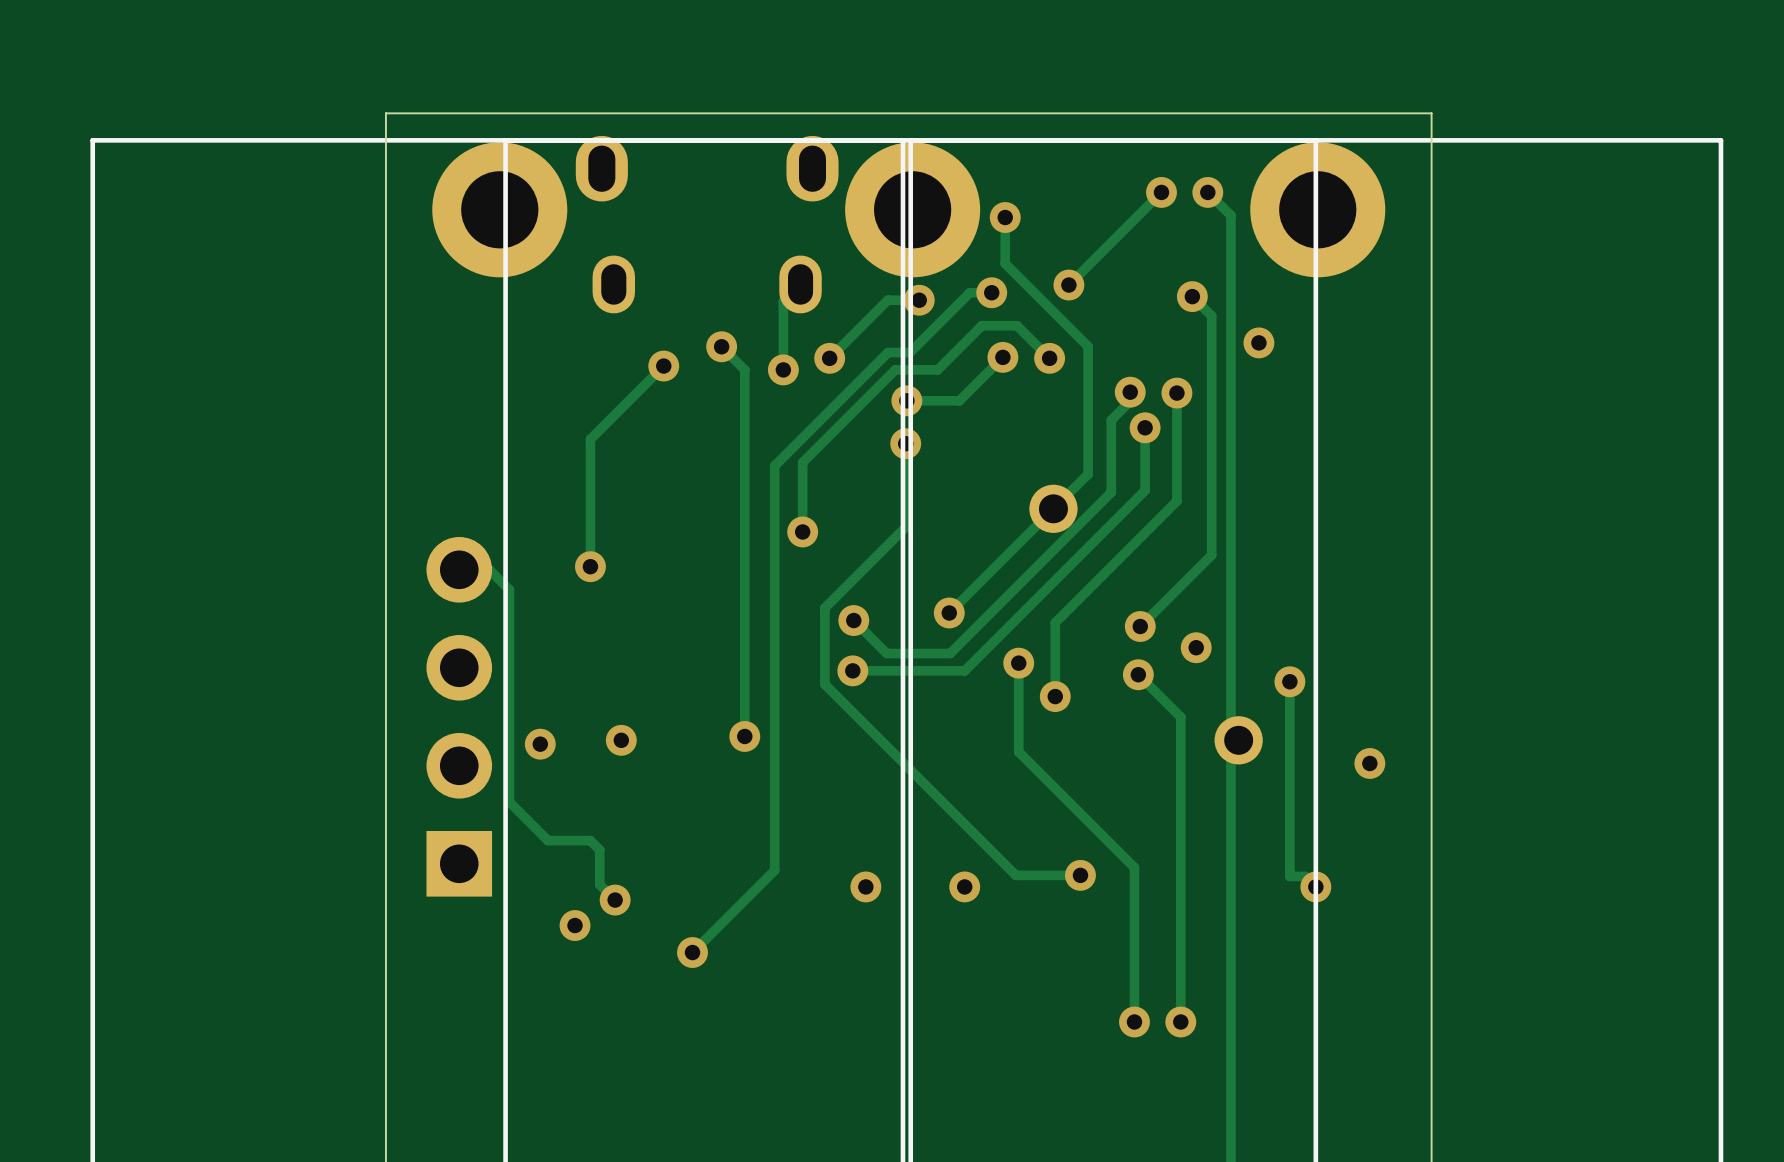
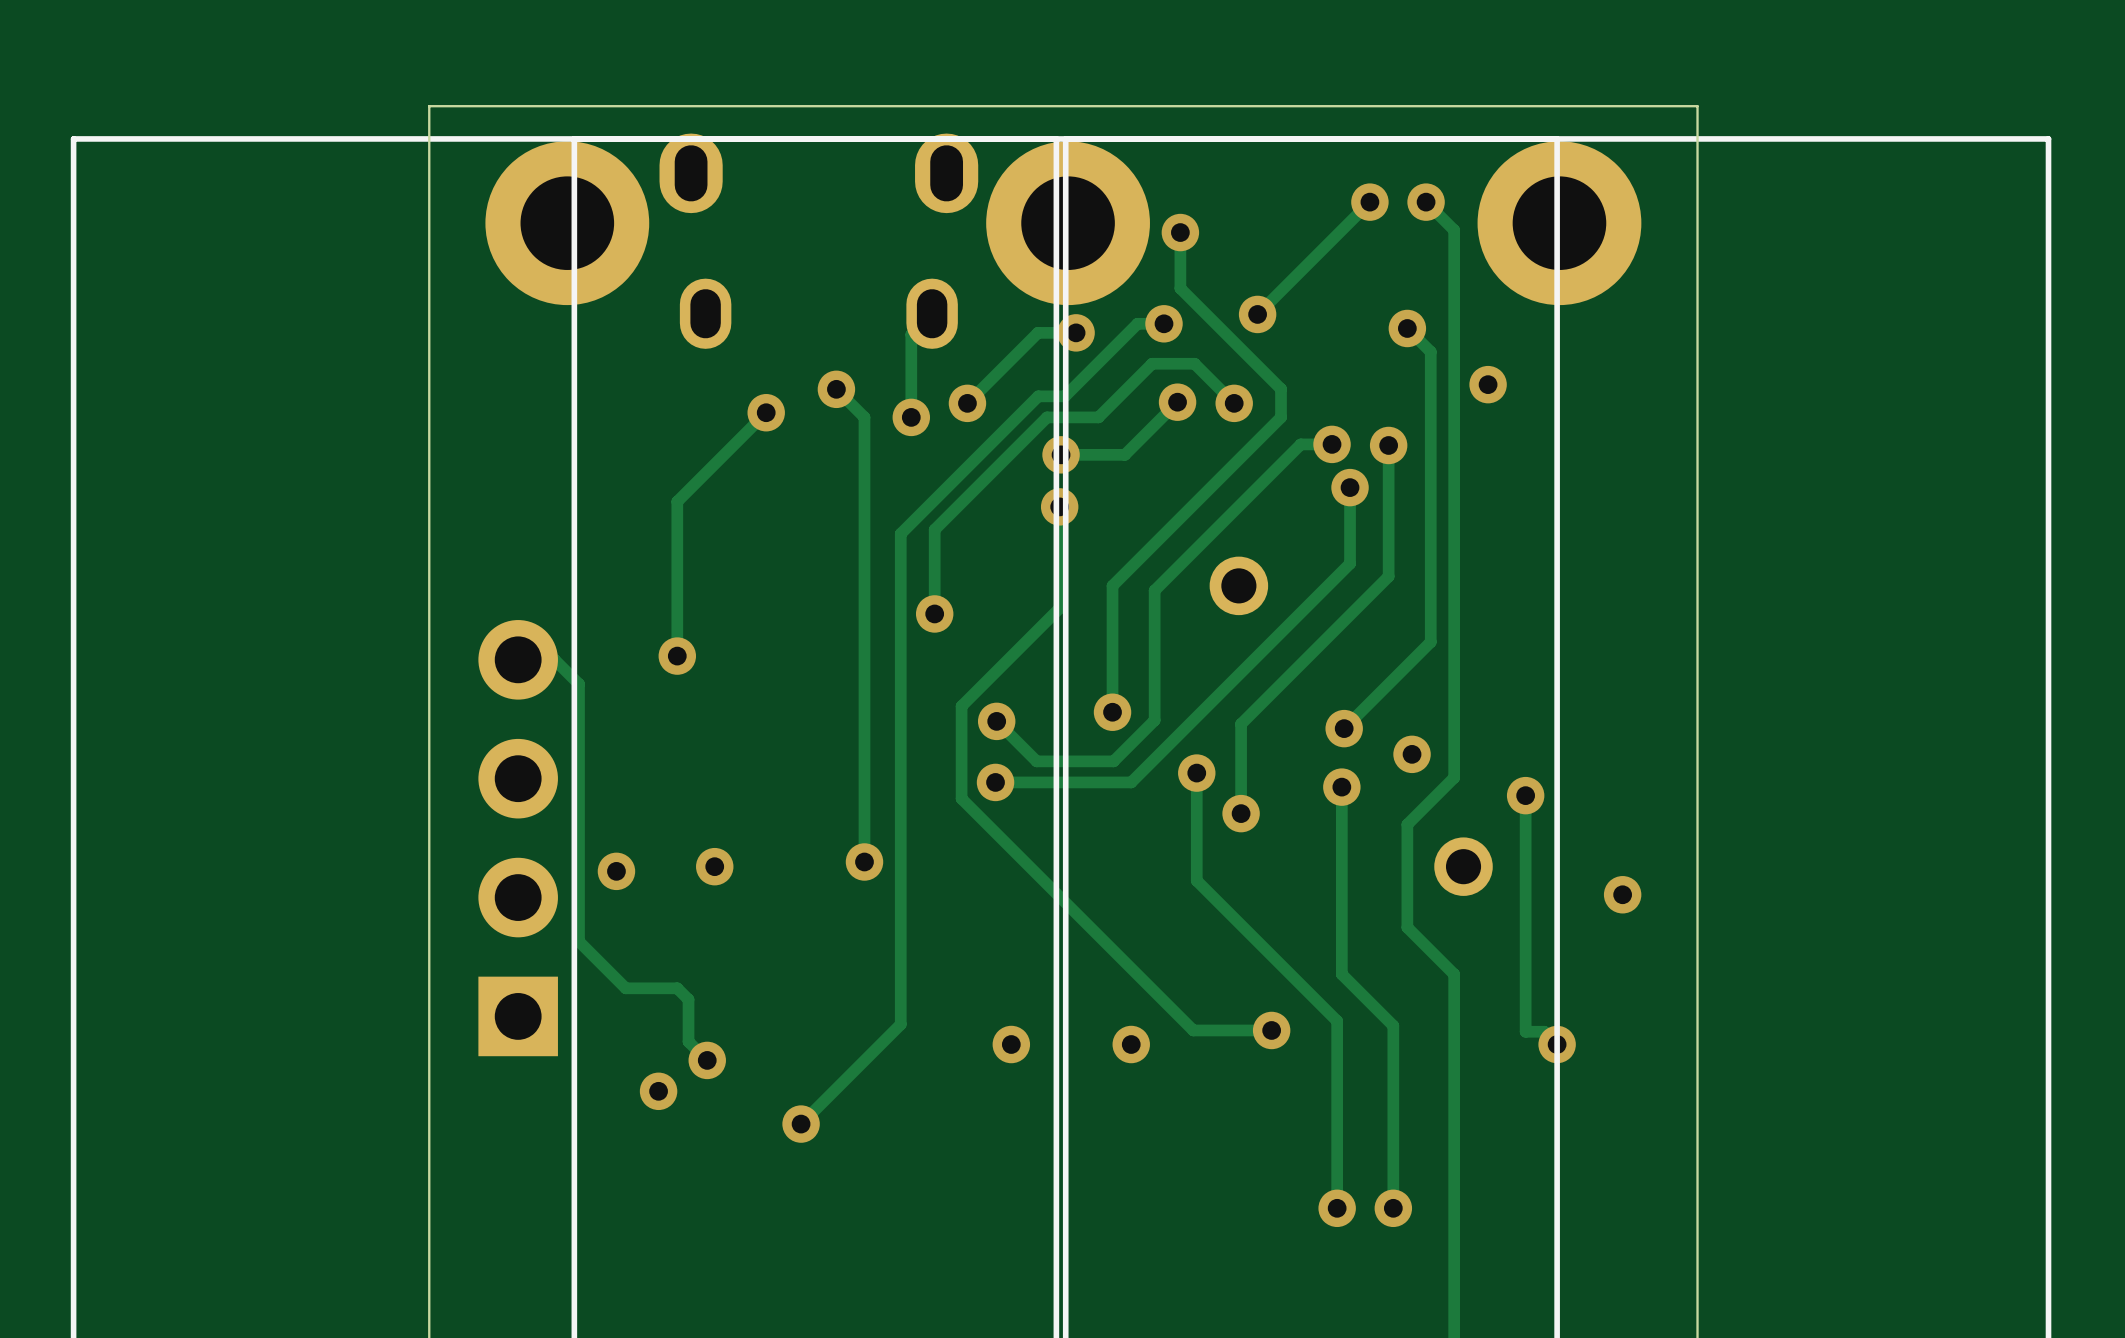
track: (1088, 369) (1088, 474) (949, 613) -> (1281, 417) (1112, 585) (1112, 712)
track: (1130, 392) (1130, 401) (1111, 420) (1111, 492) (984, 619) -> (1332, 444) (1300, 444) (1154, 590) (1154, 720)
track: (1230, 667) (1230, 829) -> (1454, 777) (1407, 824) (1407, 927) (1454, 974)
track: (1138, 674) (1180, 717) (1180, 871) -> (1341, 787) (1341, 974) (1393, 1025)

